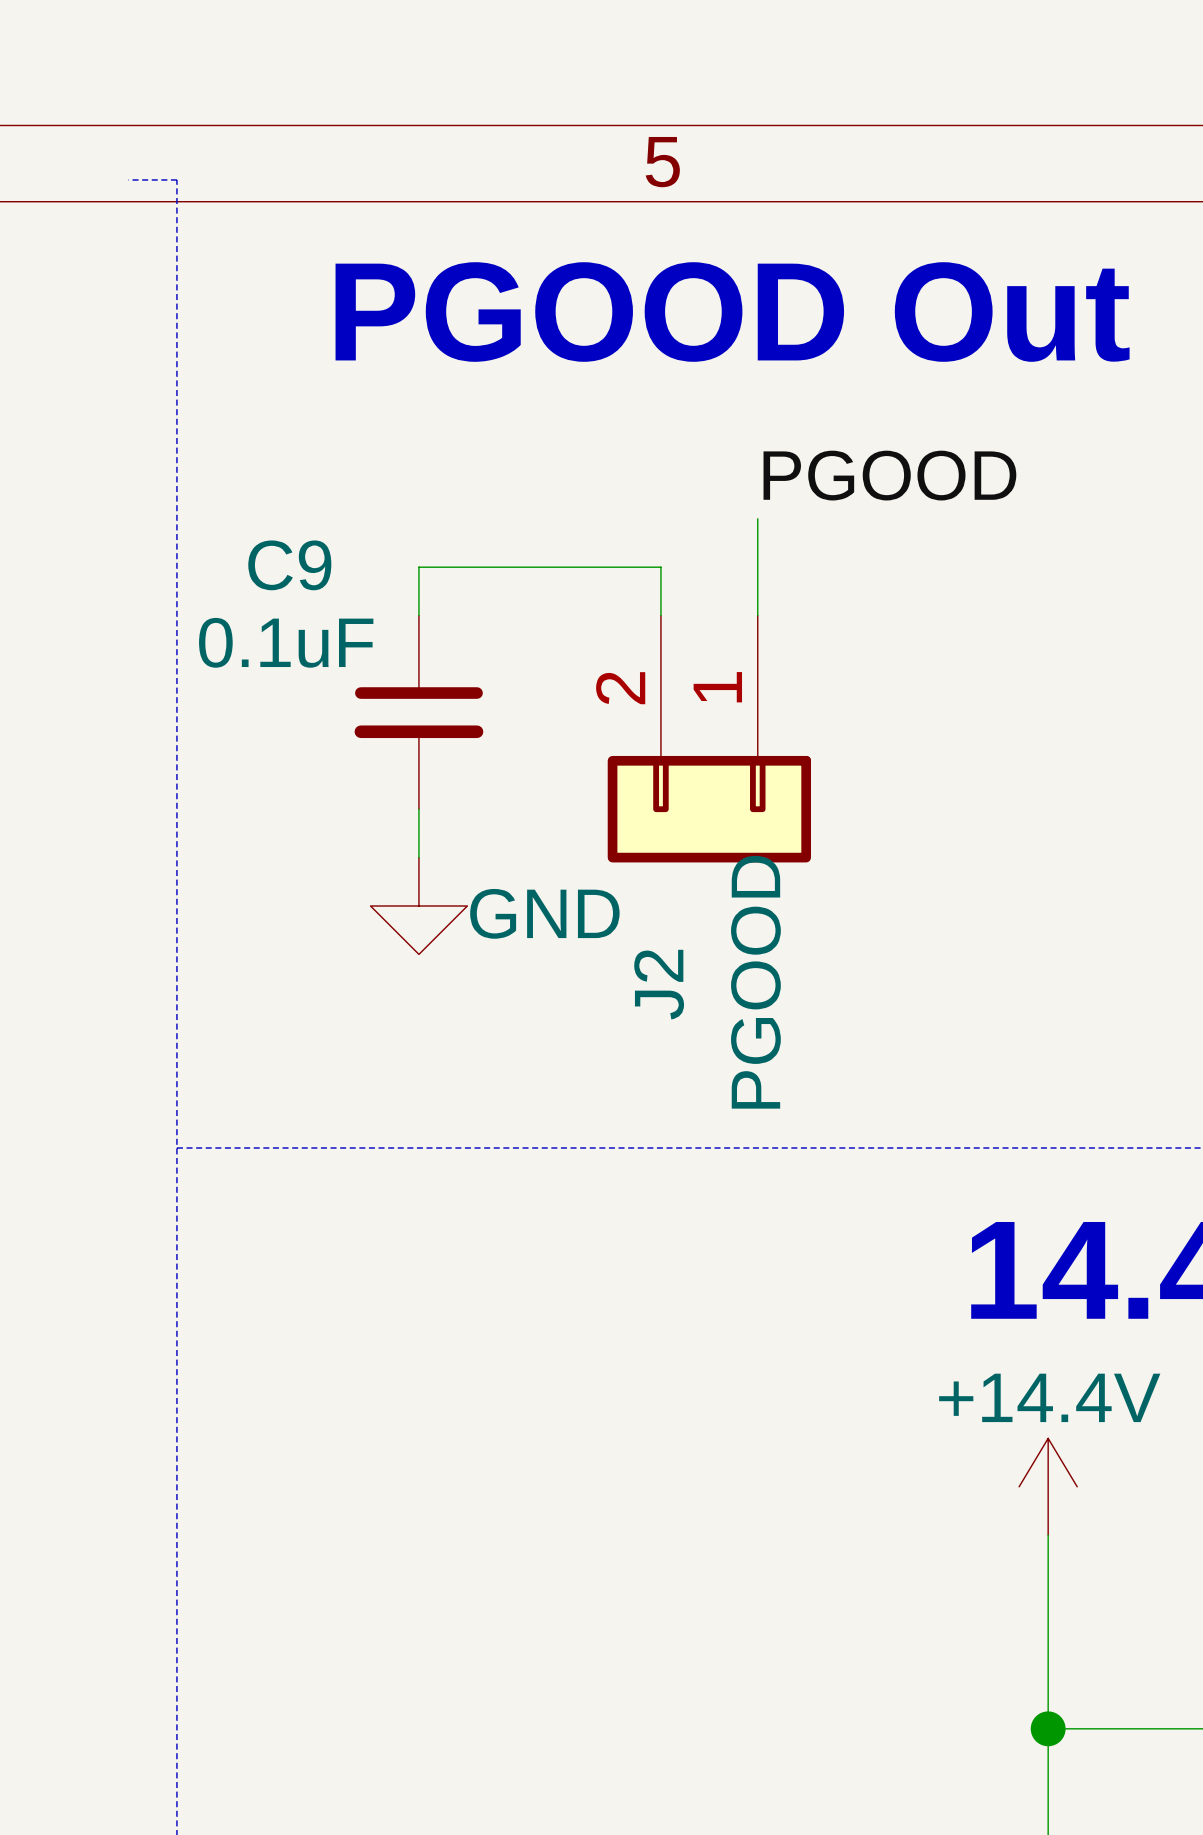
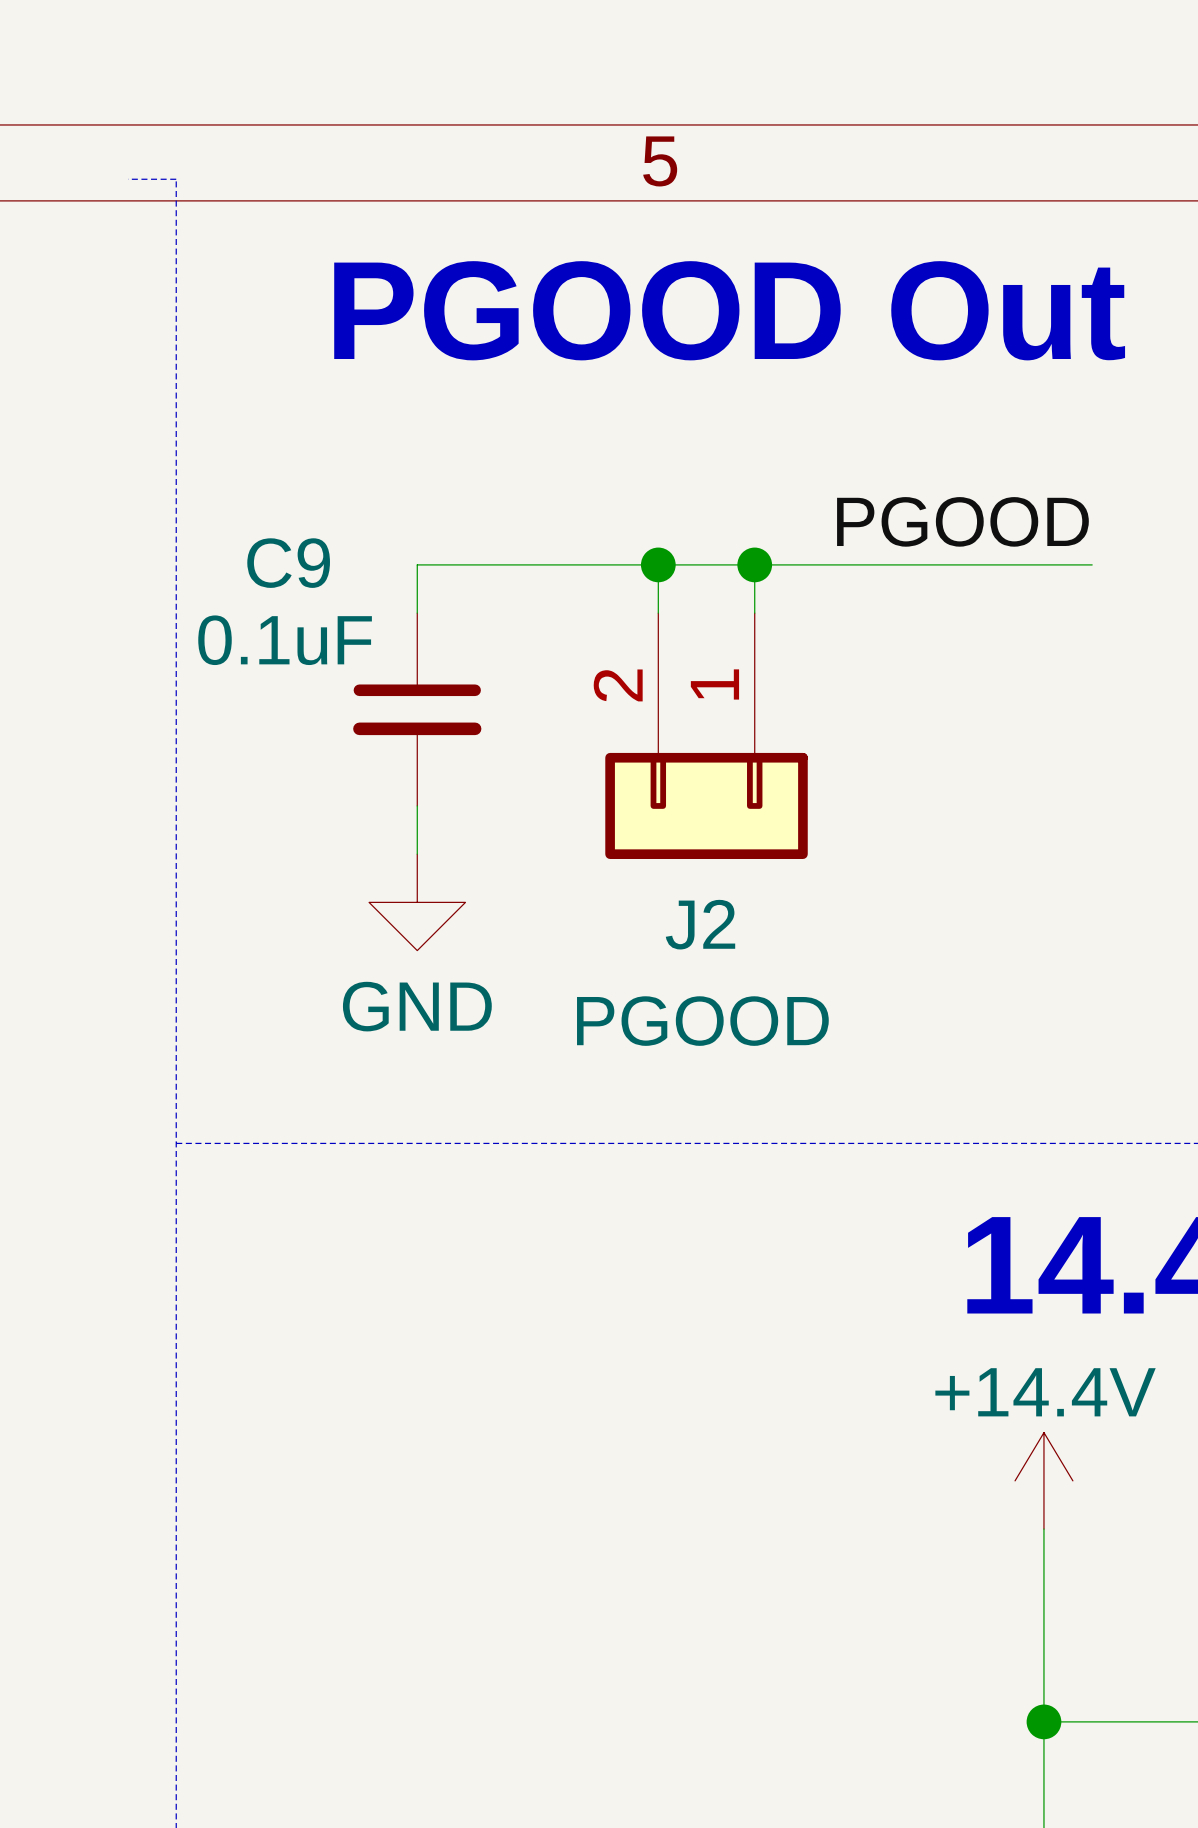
label position: PGOOD (889, 475) -> PGOOD (962, 521)
wire: (757, 518) (757, 567) -> none
wire: none -> (658, 564) (1092, 564)
junction: none -> (658, 564)
junction: none -> (754, 564)
power symbol text position: GND (544, 913) -> GND (417, 1006)
J2 value rotation: 0° (755, 982) -> 90° clockwise (702, 1021)
J2 name rotation: 0° (659, 984) -> 90° clockwise (700, 924)

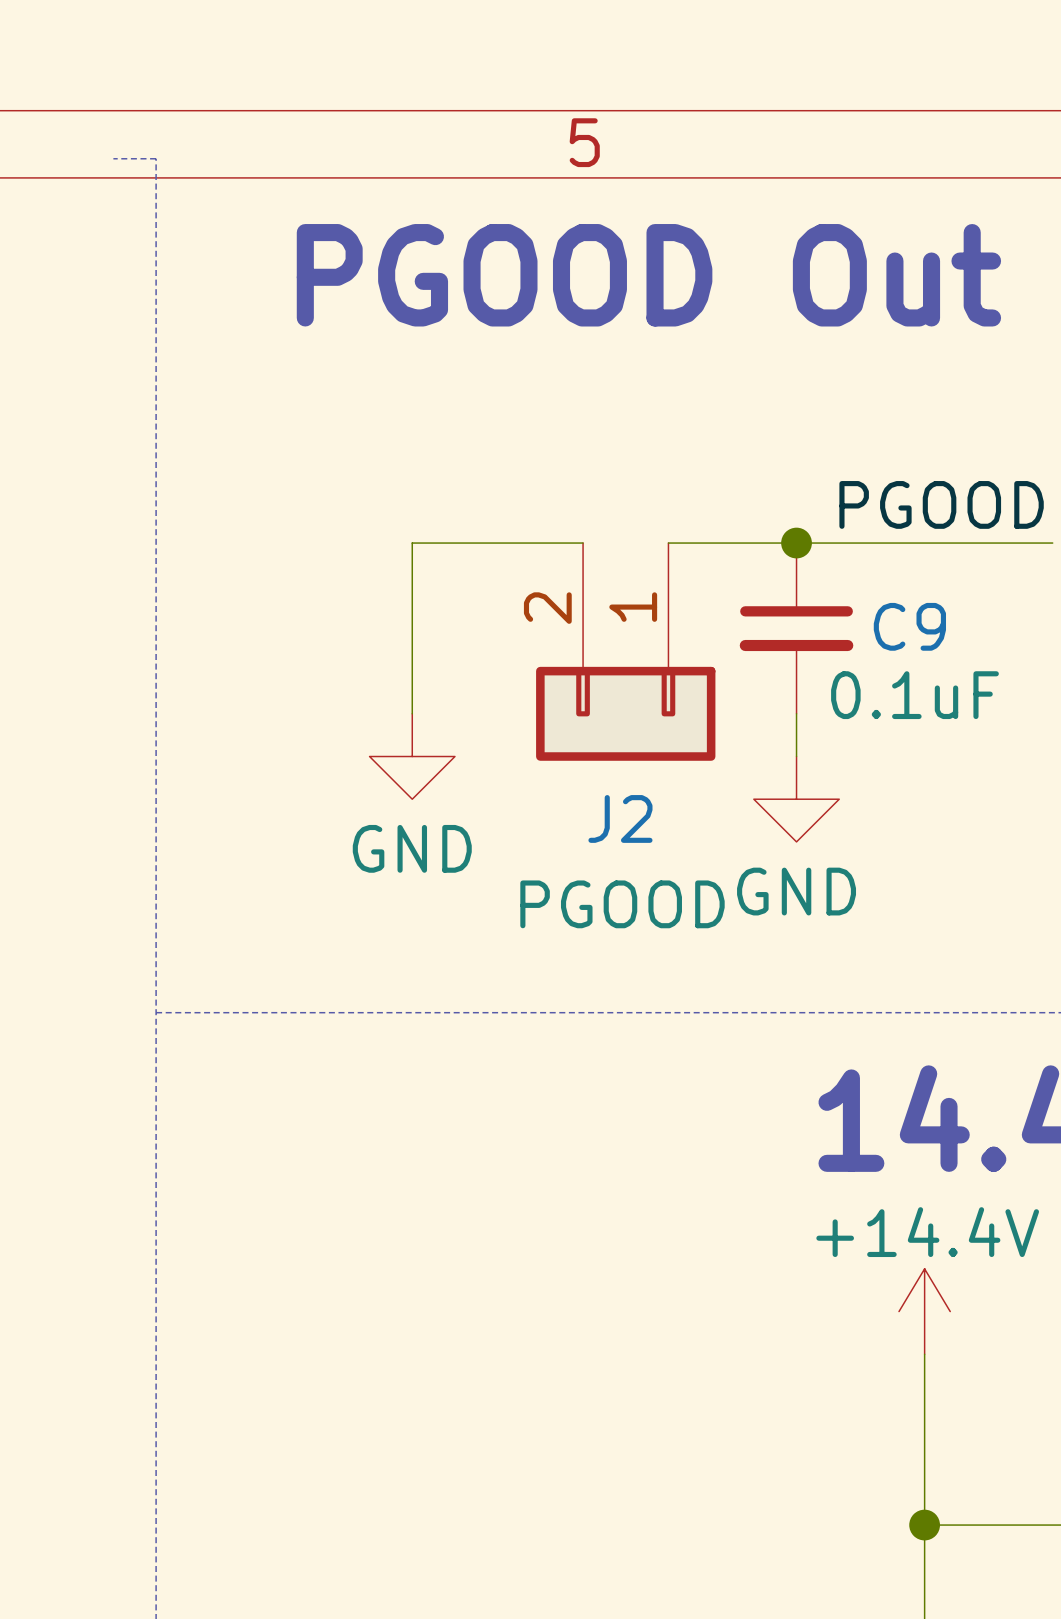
label position: PGOOD (962, 521) -> PGOOD (941, 504)
C9 name position: C9 (288, 563) -> C9 (909, 626)
wire: (658, 564) (658, 613) -> (412, 713) (412, 543) (583, 543)
junction: (658, 564) -> none
wire: (754, 564) (754, 613) -> (1052, 543) (668, 543)
junction: (754, 564) -> none
wire: (1092, 564) (417, 564) (417, 613) -> none
junction: none -> (796, 543)
C9 value position: 0.1uF (285, 640) -> 0.1uF (914, 695)
C9 position: (417, 709) -> (796, 628)
wire: (417, 805) (417, 854) -> (796, 713) (796, 756)
power symbol position: GND (417, 902) -> GND (412, 756)
power symbol: none -> GND (796, 799)

